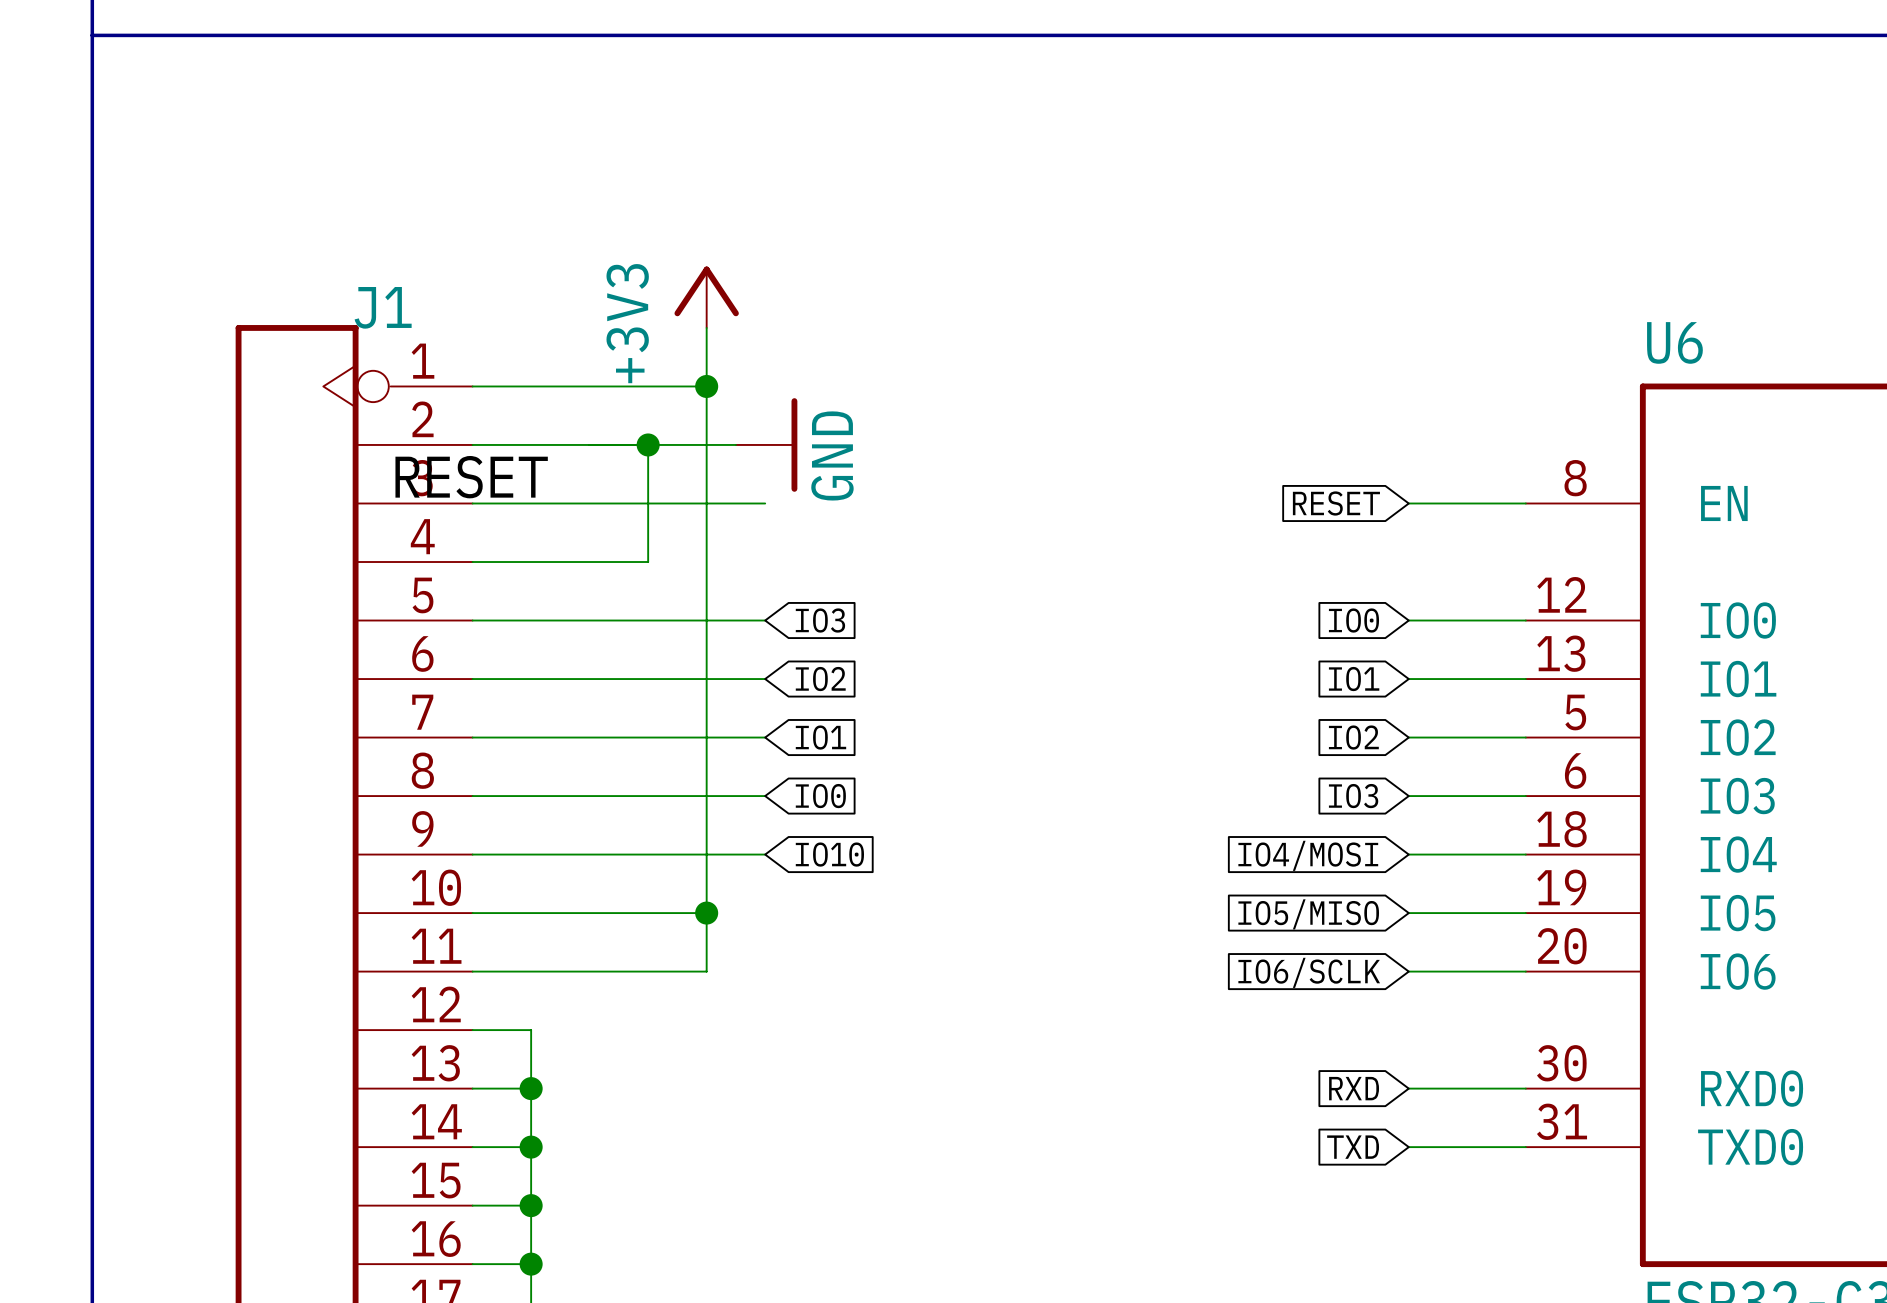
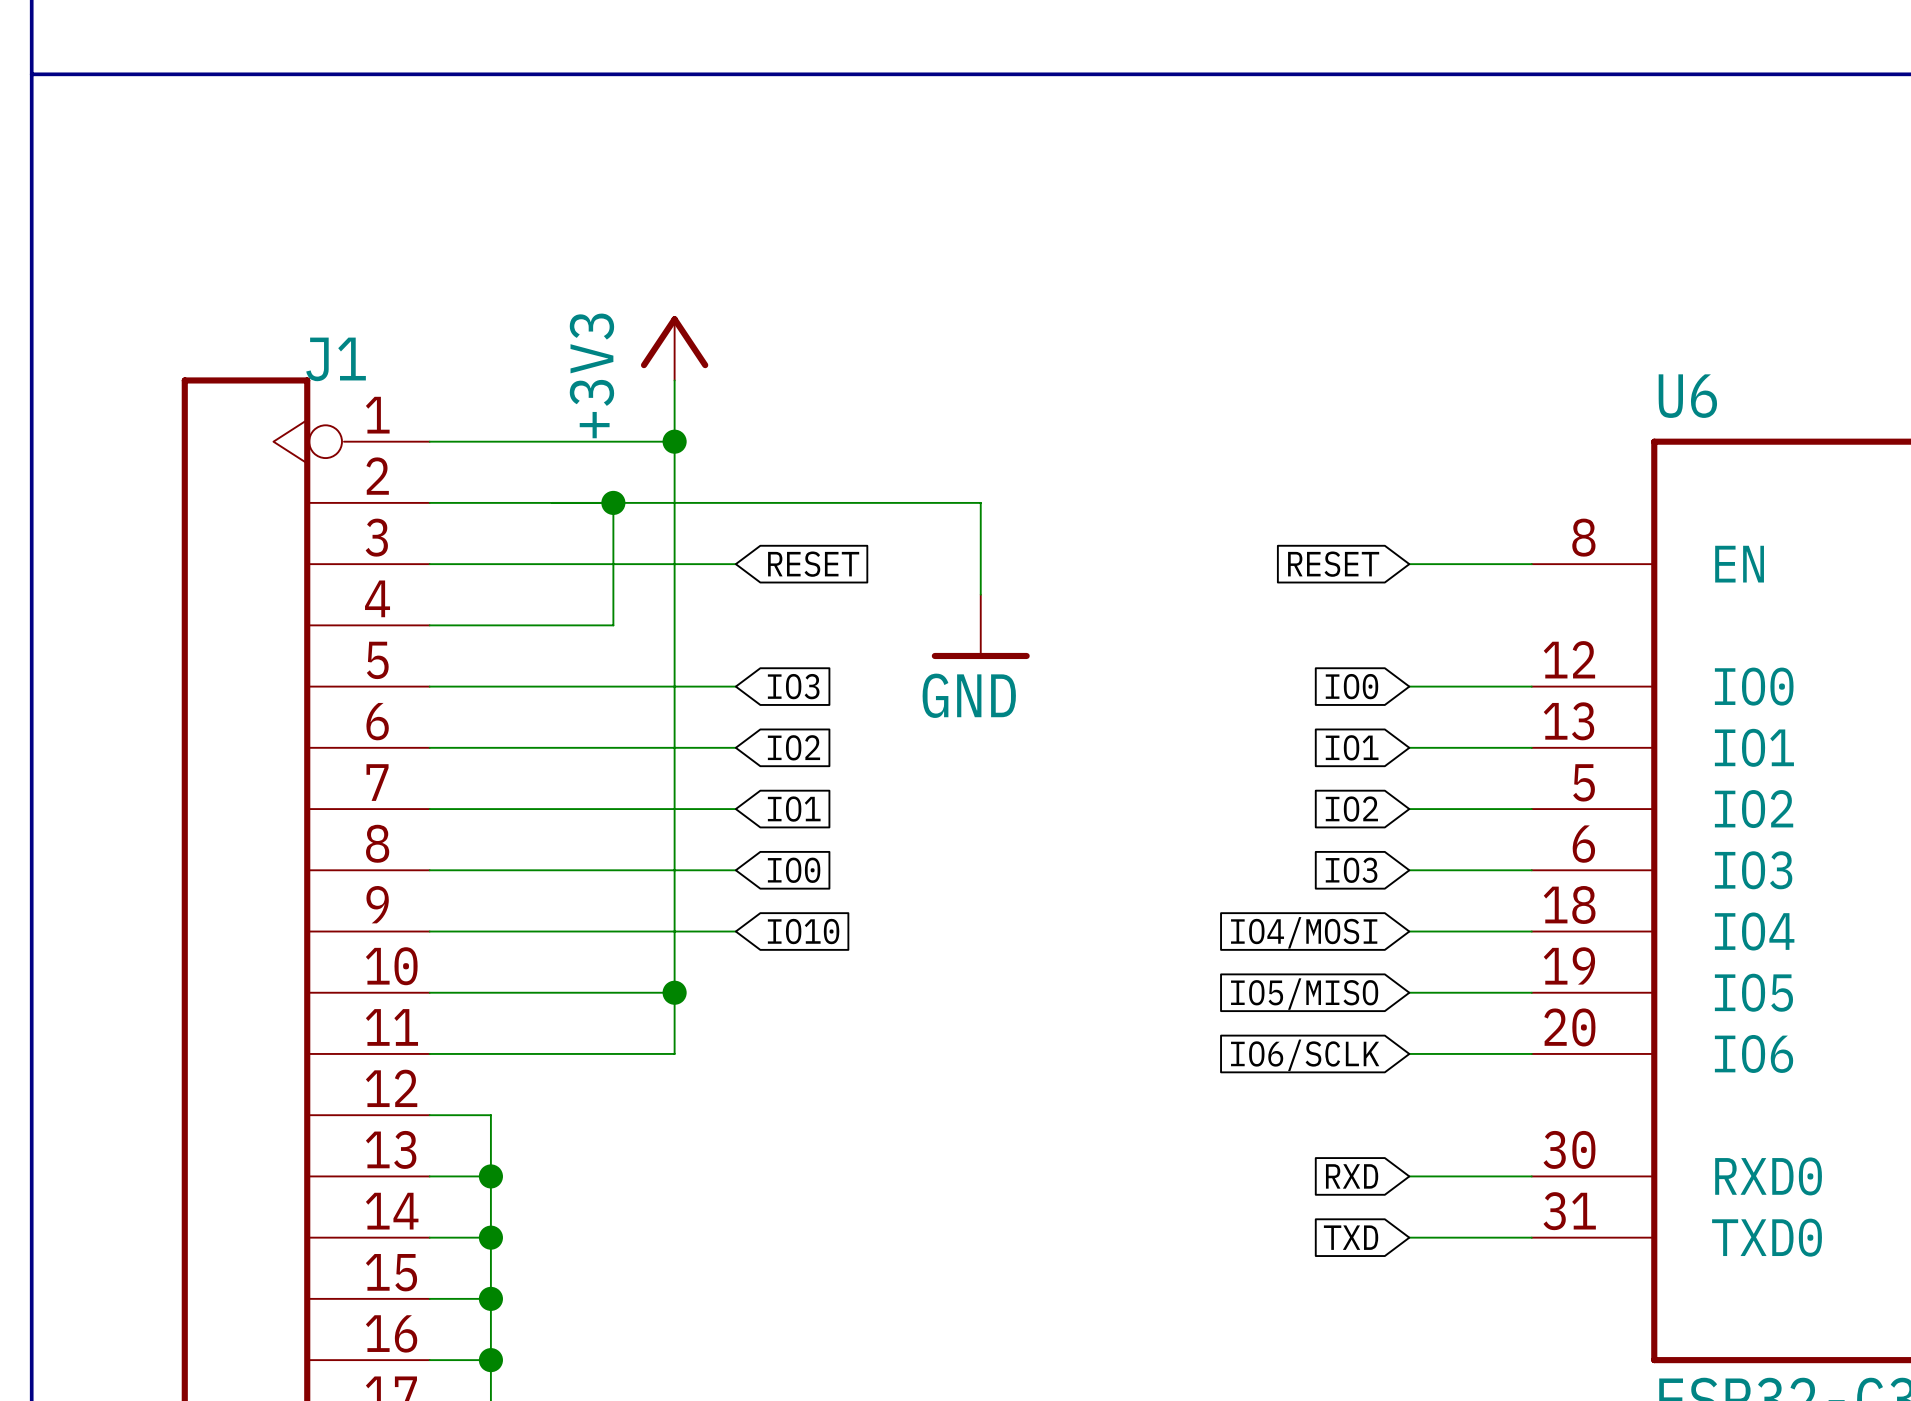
wire: none -> (705, 502) (980, 502) (980, 594)
power symbol position: GND (766, 444) -> GND (980, 626)
power symbol rotation: 0° (794, 444) -> 90° clockwise (980, 655)
label: RESET (471, 477) -> none
global label: none -> RESET (813, 564)

